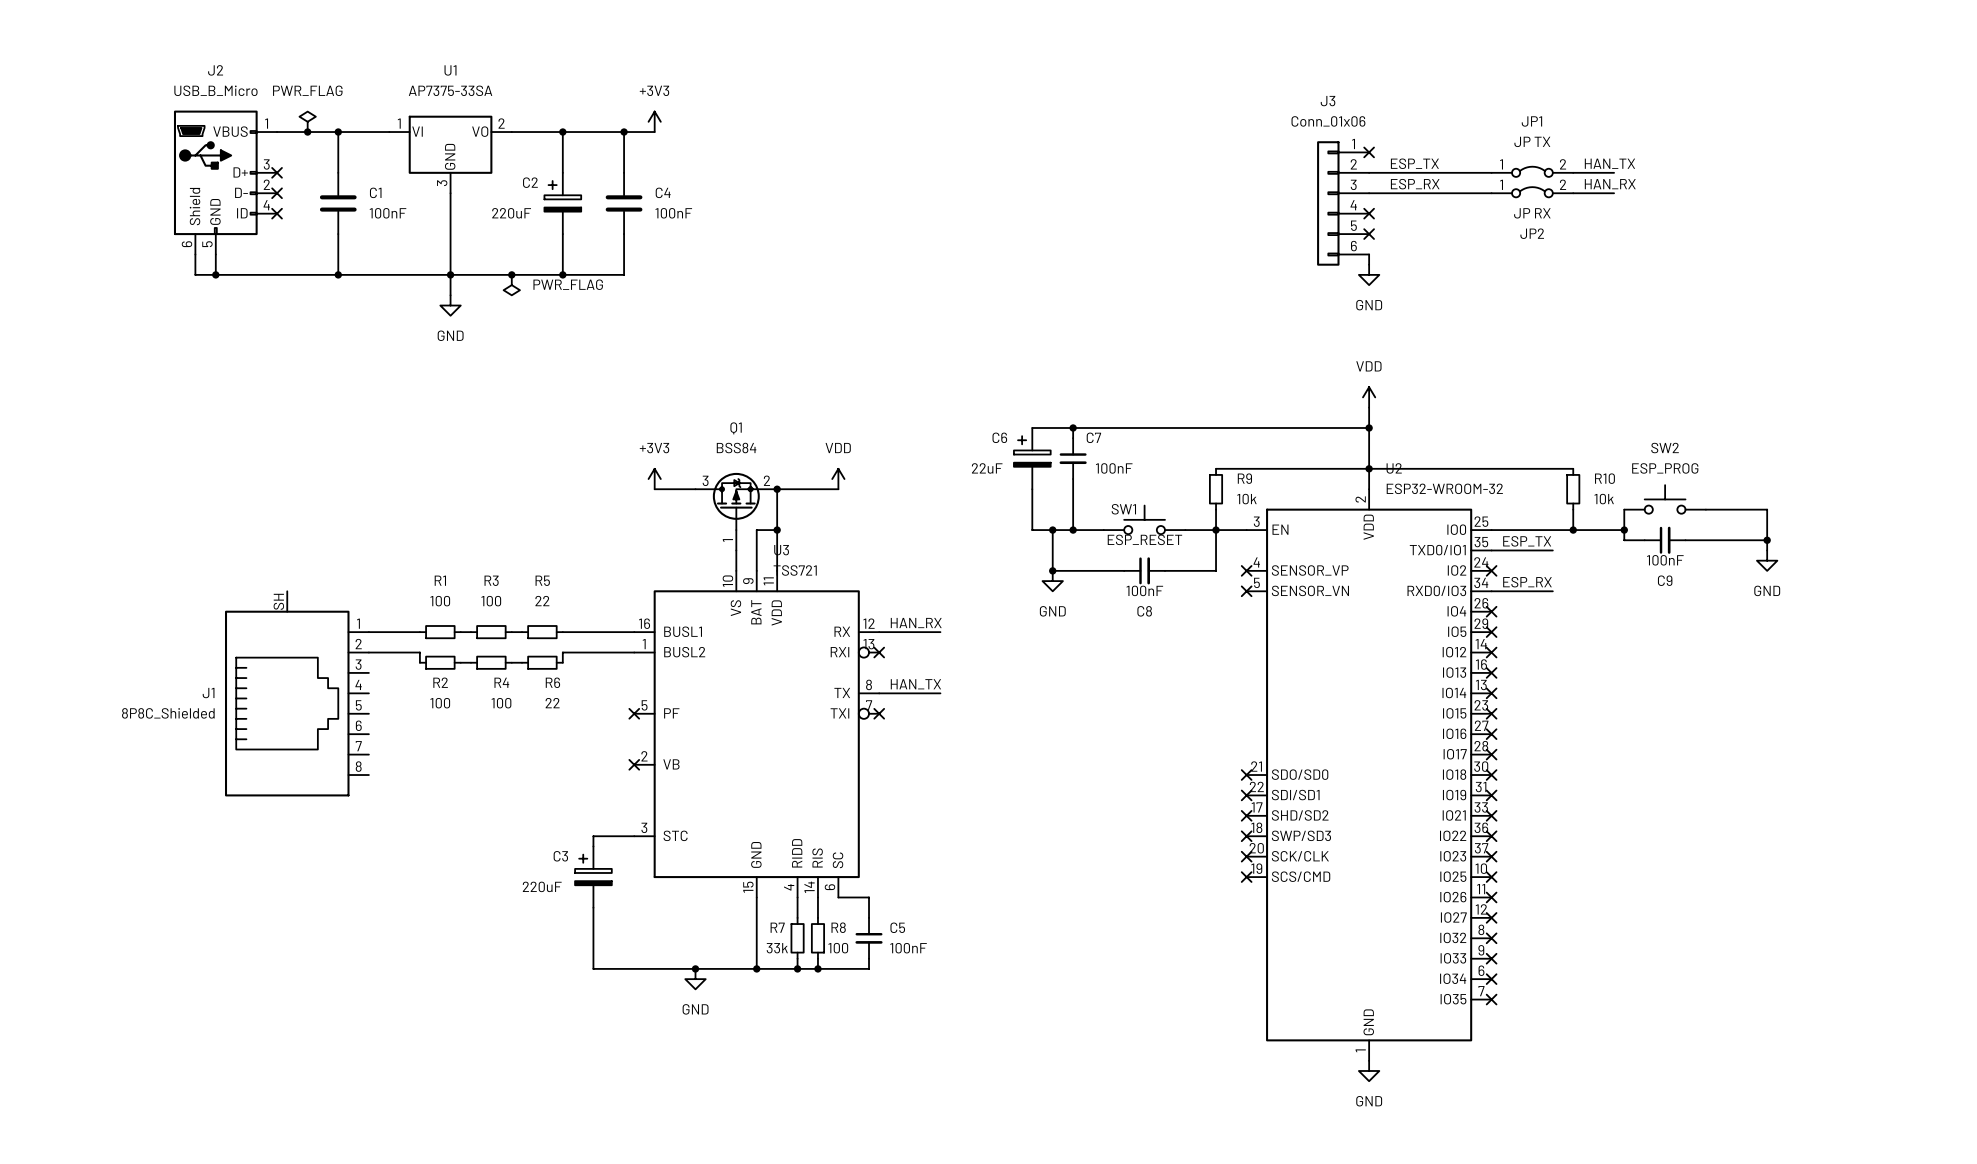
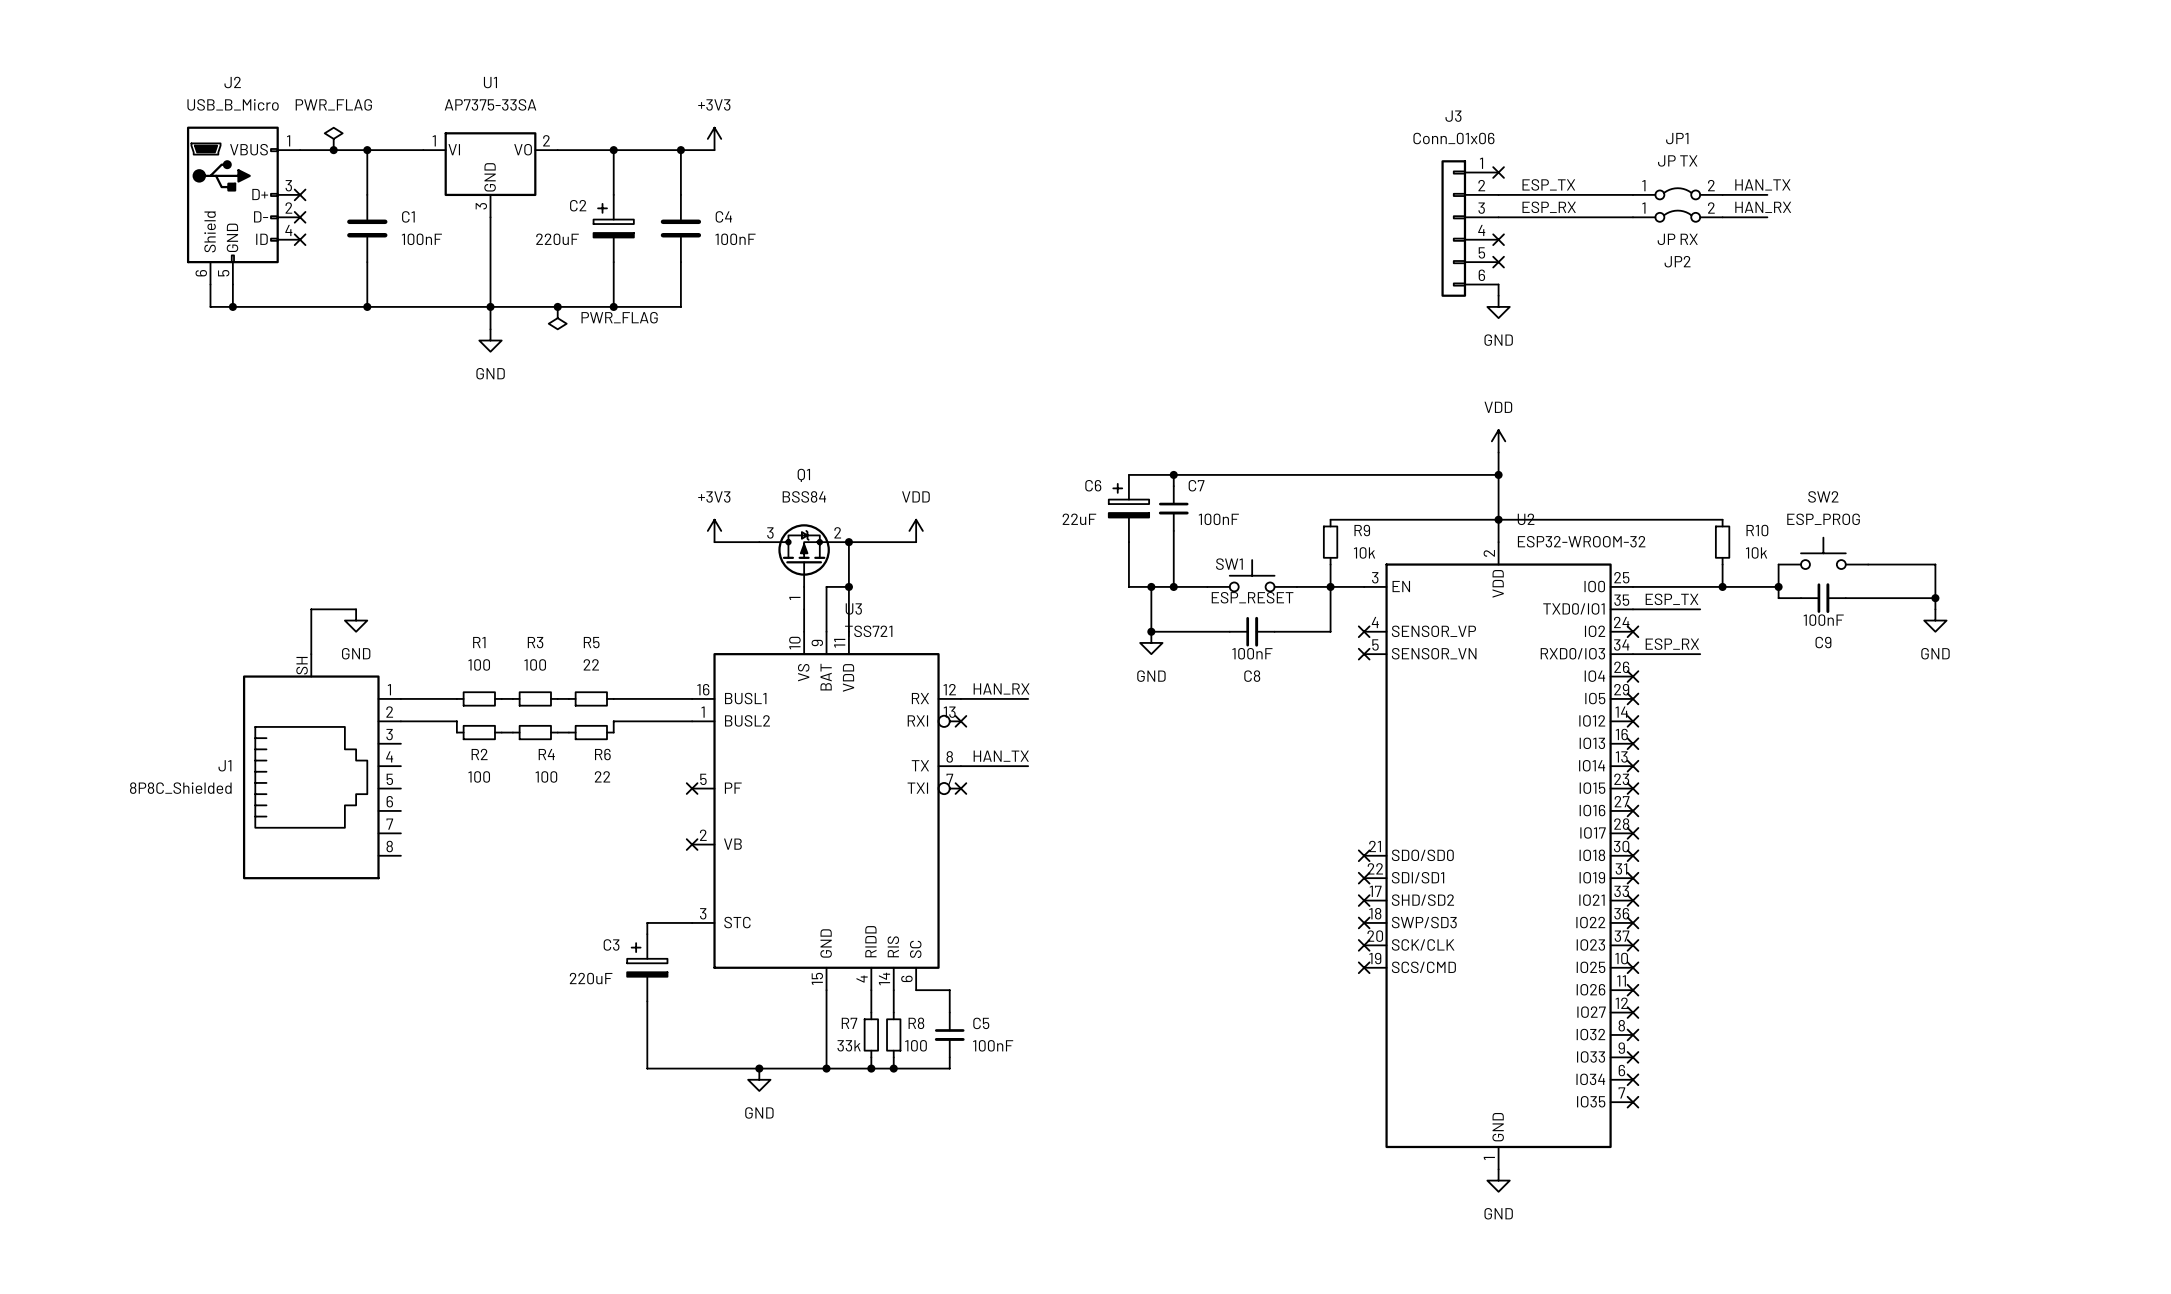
wire: none -> (356, 609) (311, 609) (311, 654)
power symbol: none -> GND (356, 620)

